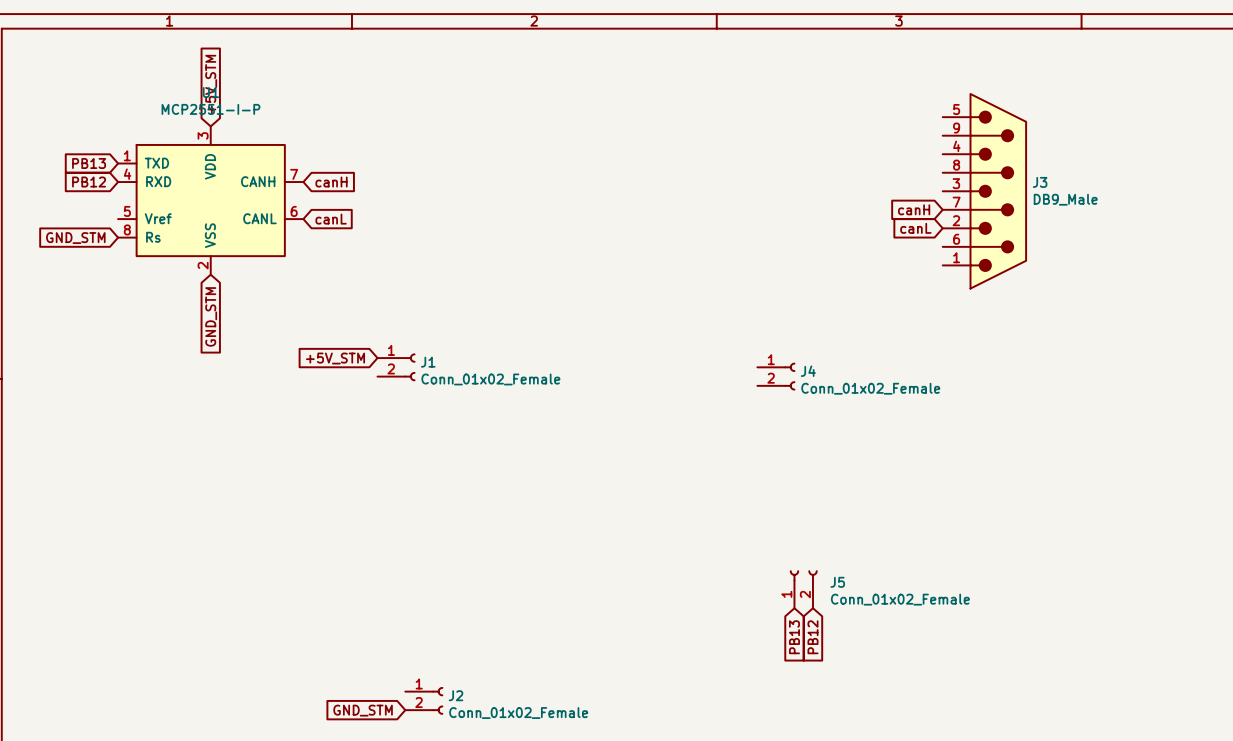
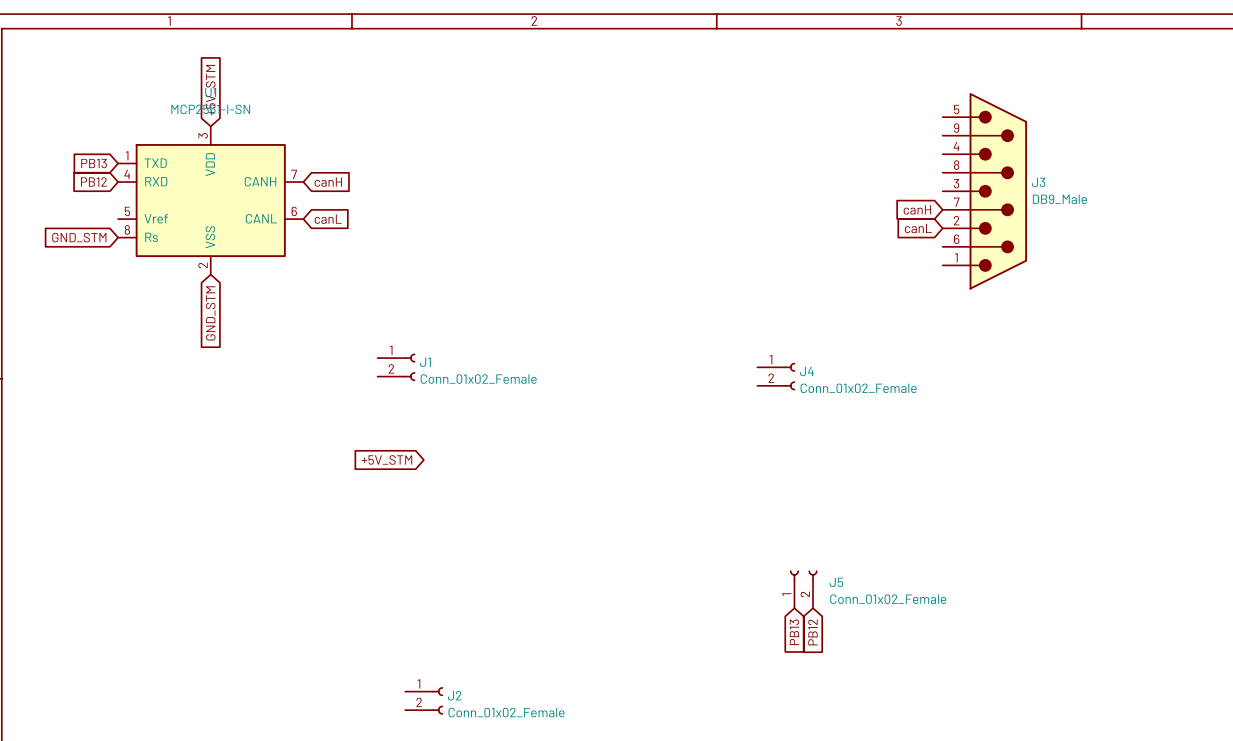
U1 value: MCP2551-I-P (210, 109) -> MCP2551-I-SN (210, 109)
global label position: +5V_STM (335, 358) -> +5V_STM (386, 459)
global label: GND_STM (363, 710) -> none

